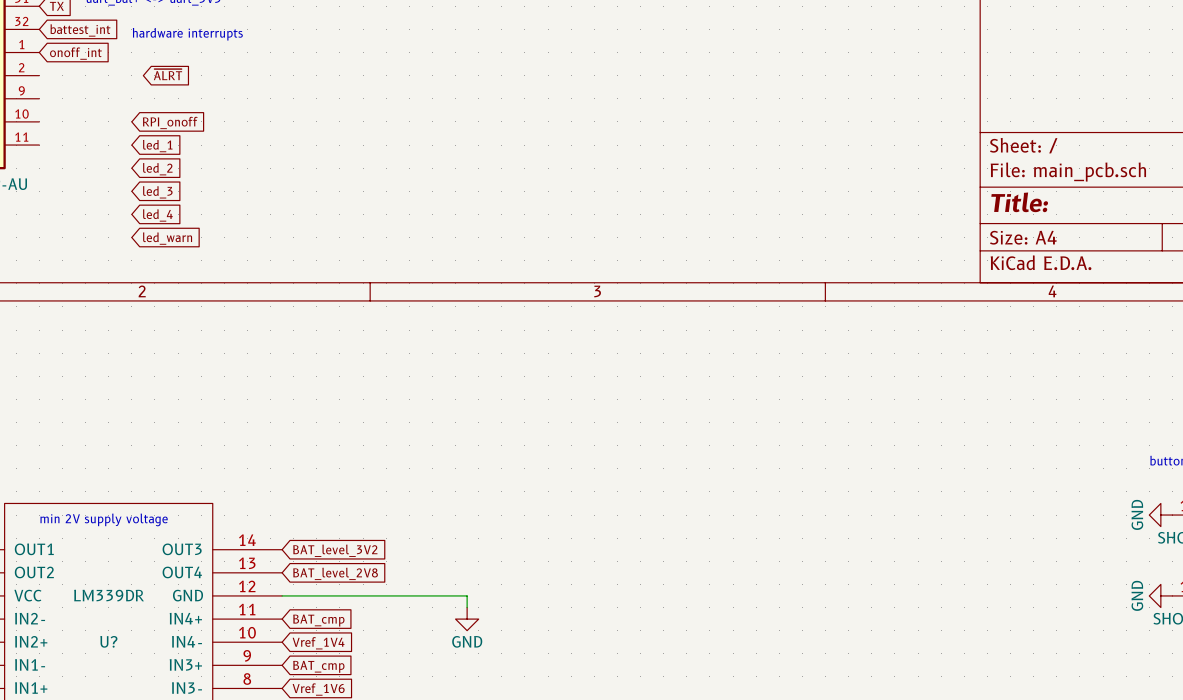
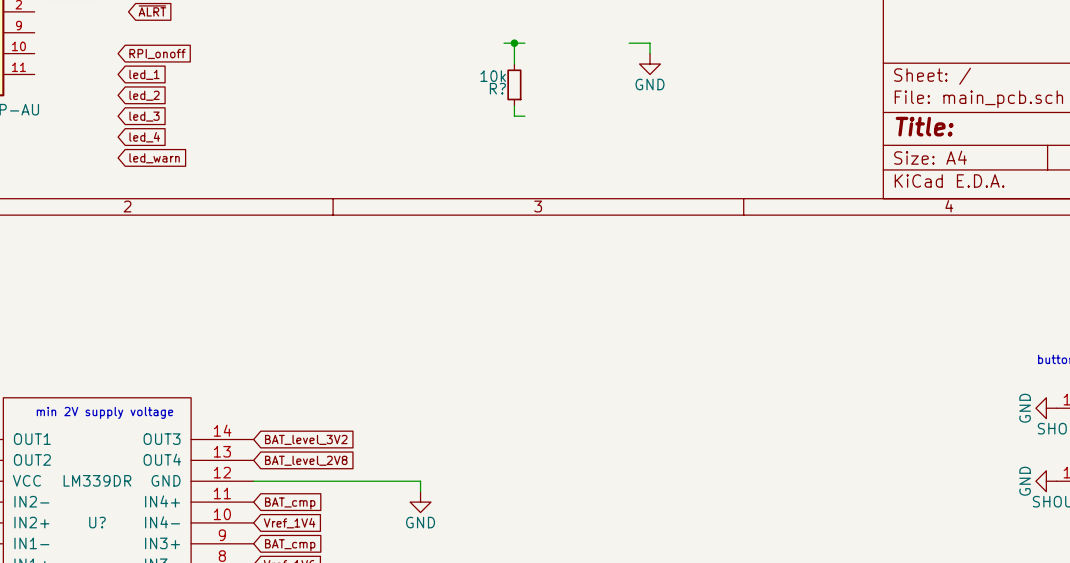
wire: none -> (503, 43) (524, 43)
wire: none -> (514, 43) (514, 64)
junction: none -> (514, 43)
wire: none -> (629, 43) (650, 43) (650, 53)
power symbol: none -> GND (650, 64)
R?: none -> 10k (514, 84)
wire: none -> (514, 105) (514, 116) (524, 116)

